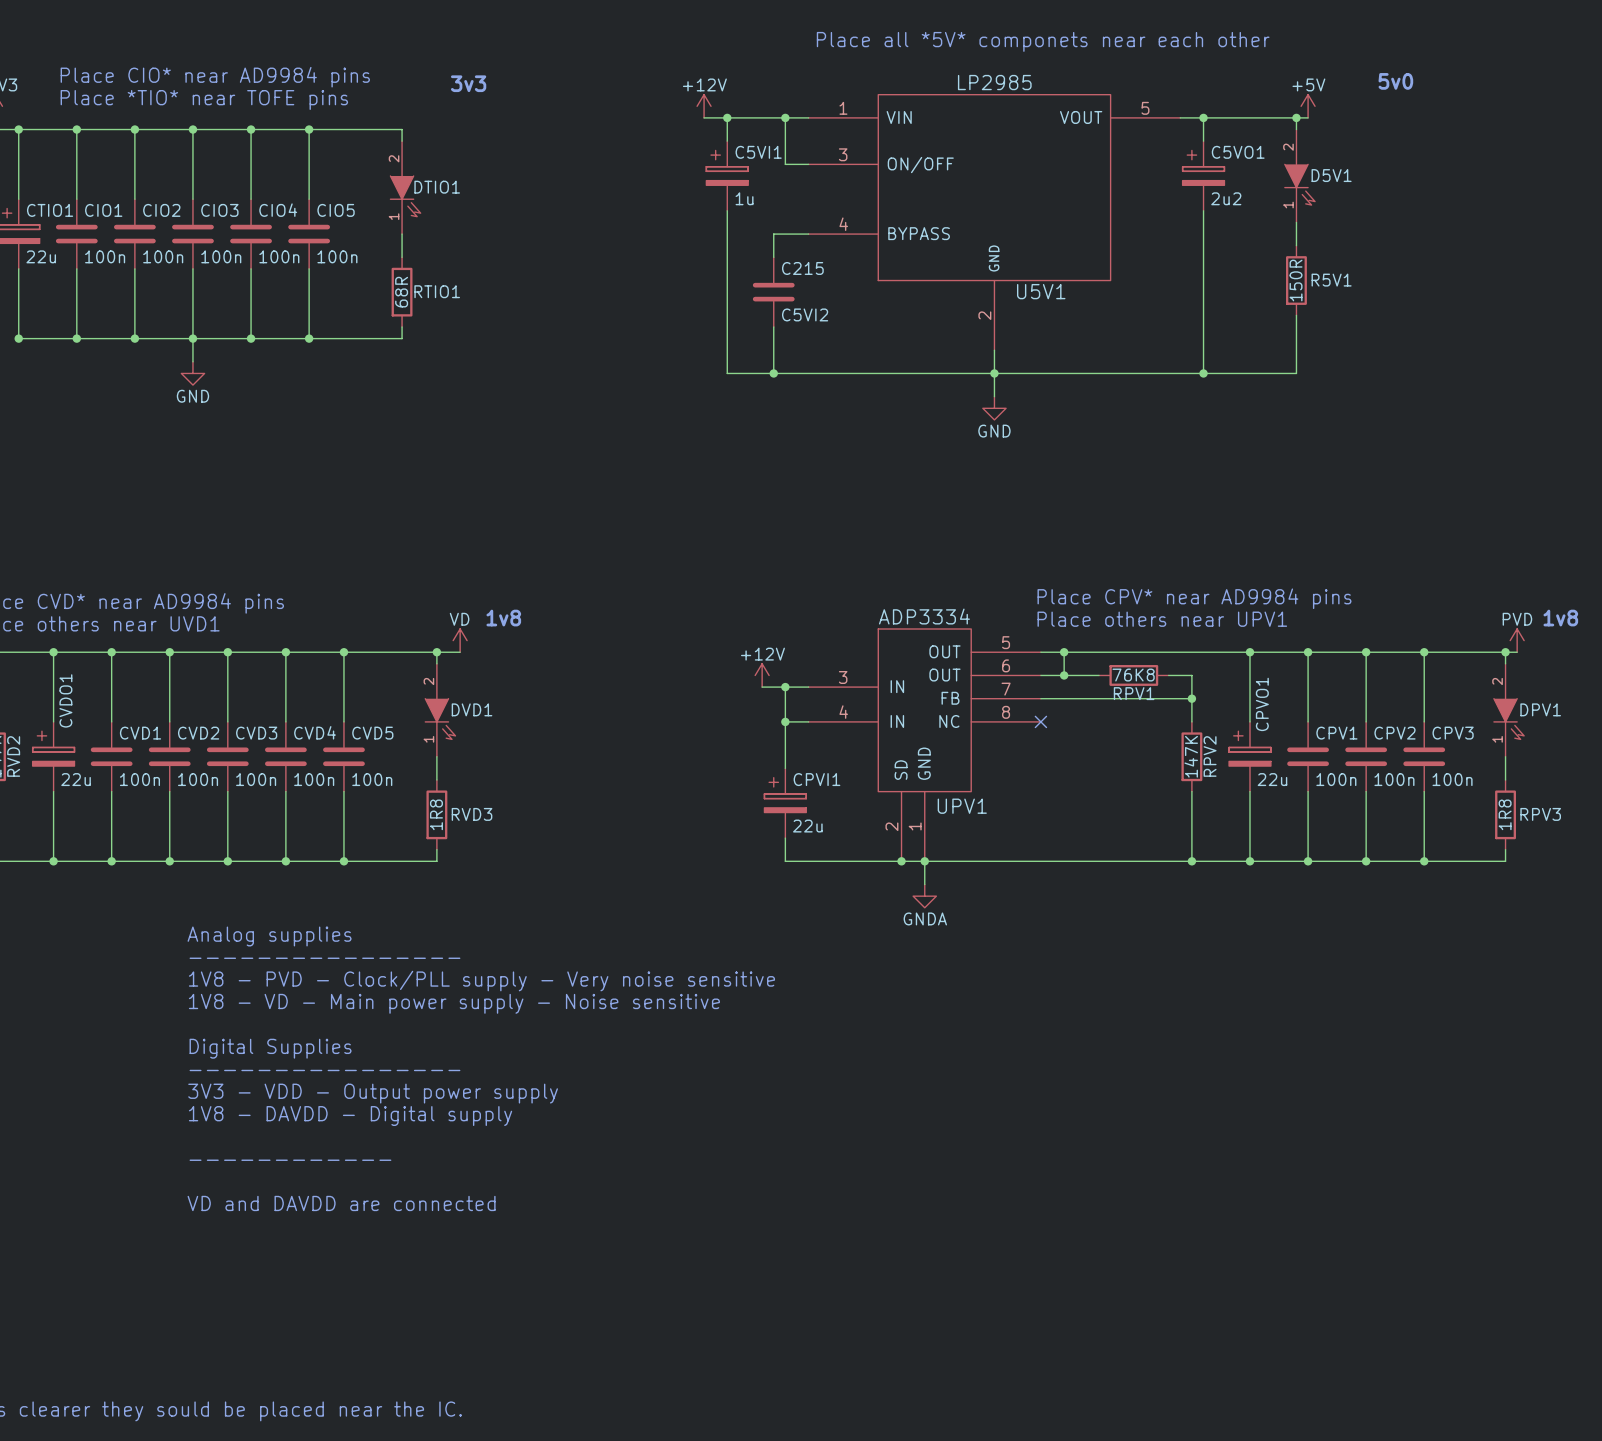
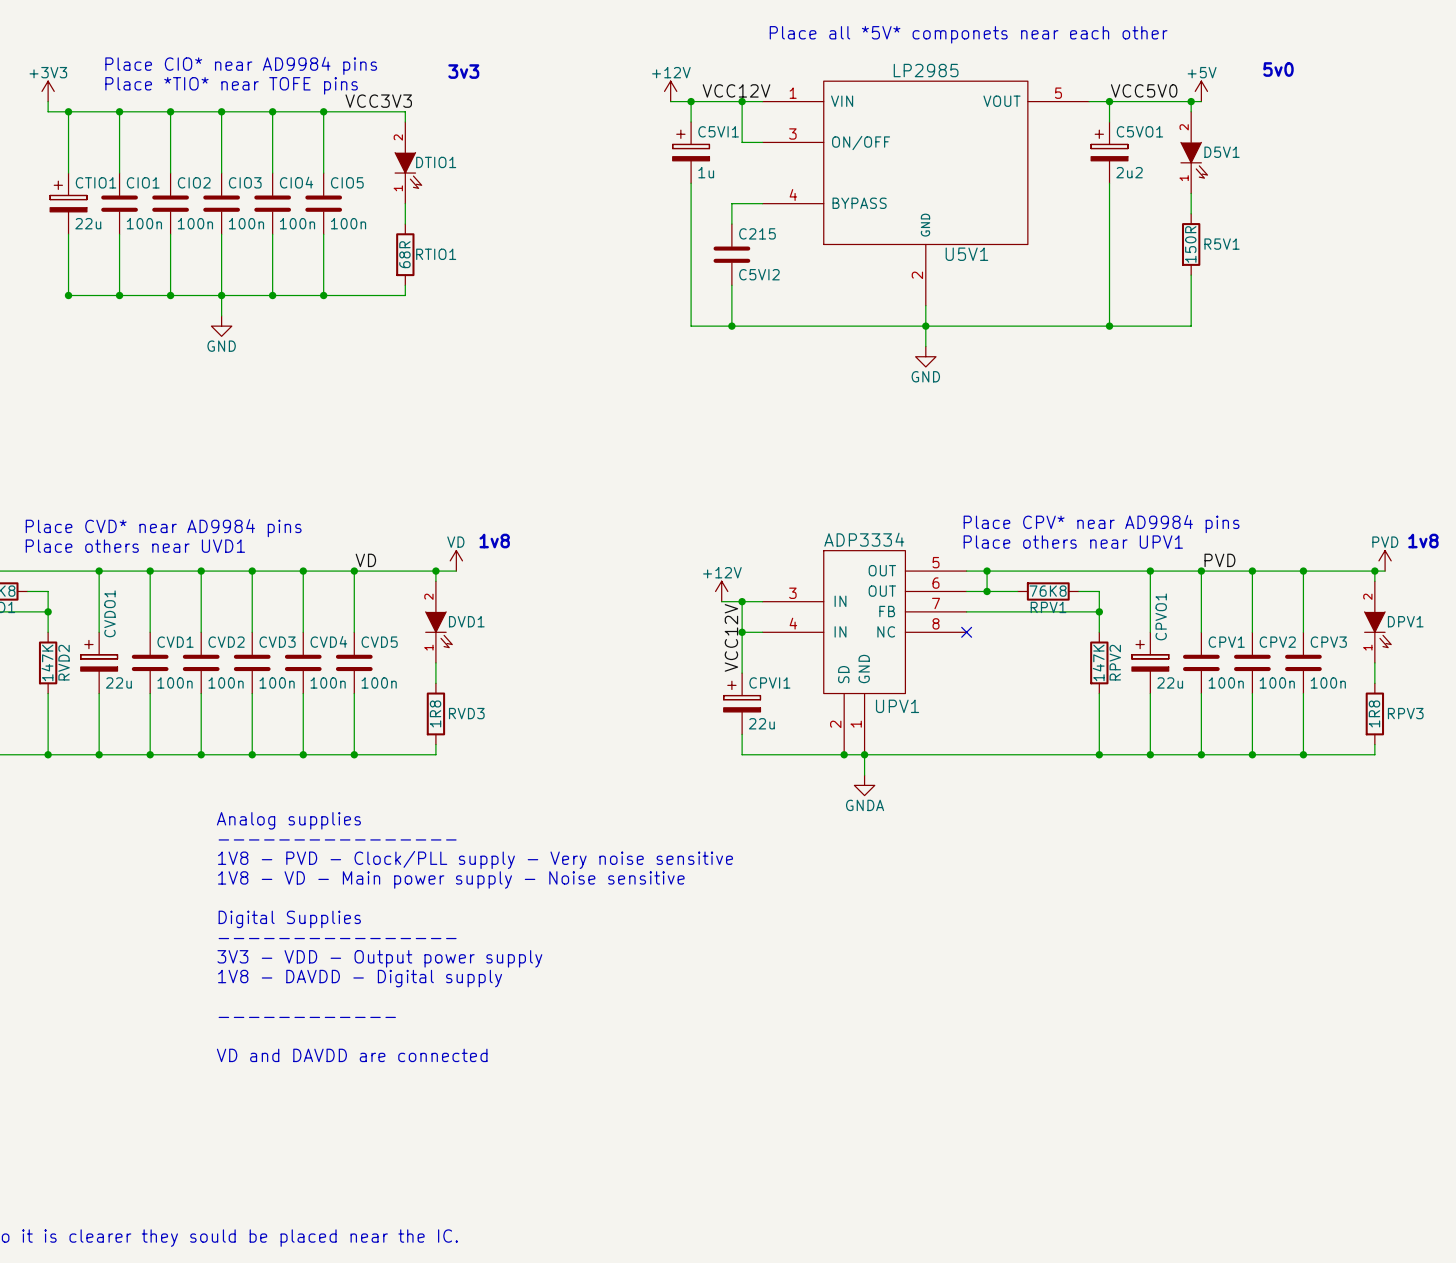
label: none -> VCC12V (736, 90)
label: none -> VCC5V0 (1144, 90)
label: none -> VCC3V3 (378, 101)
label: none -> VD (365, 560)
label: none -> PVD (1219, 560)
label: none -> VCC12V (731, 637)

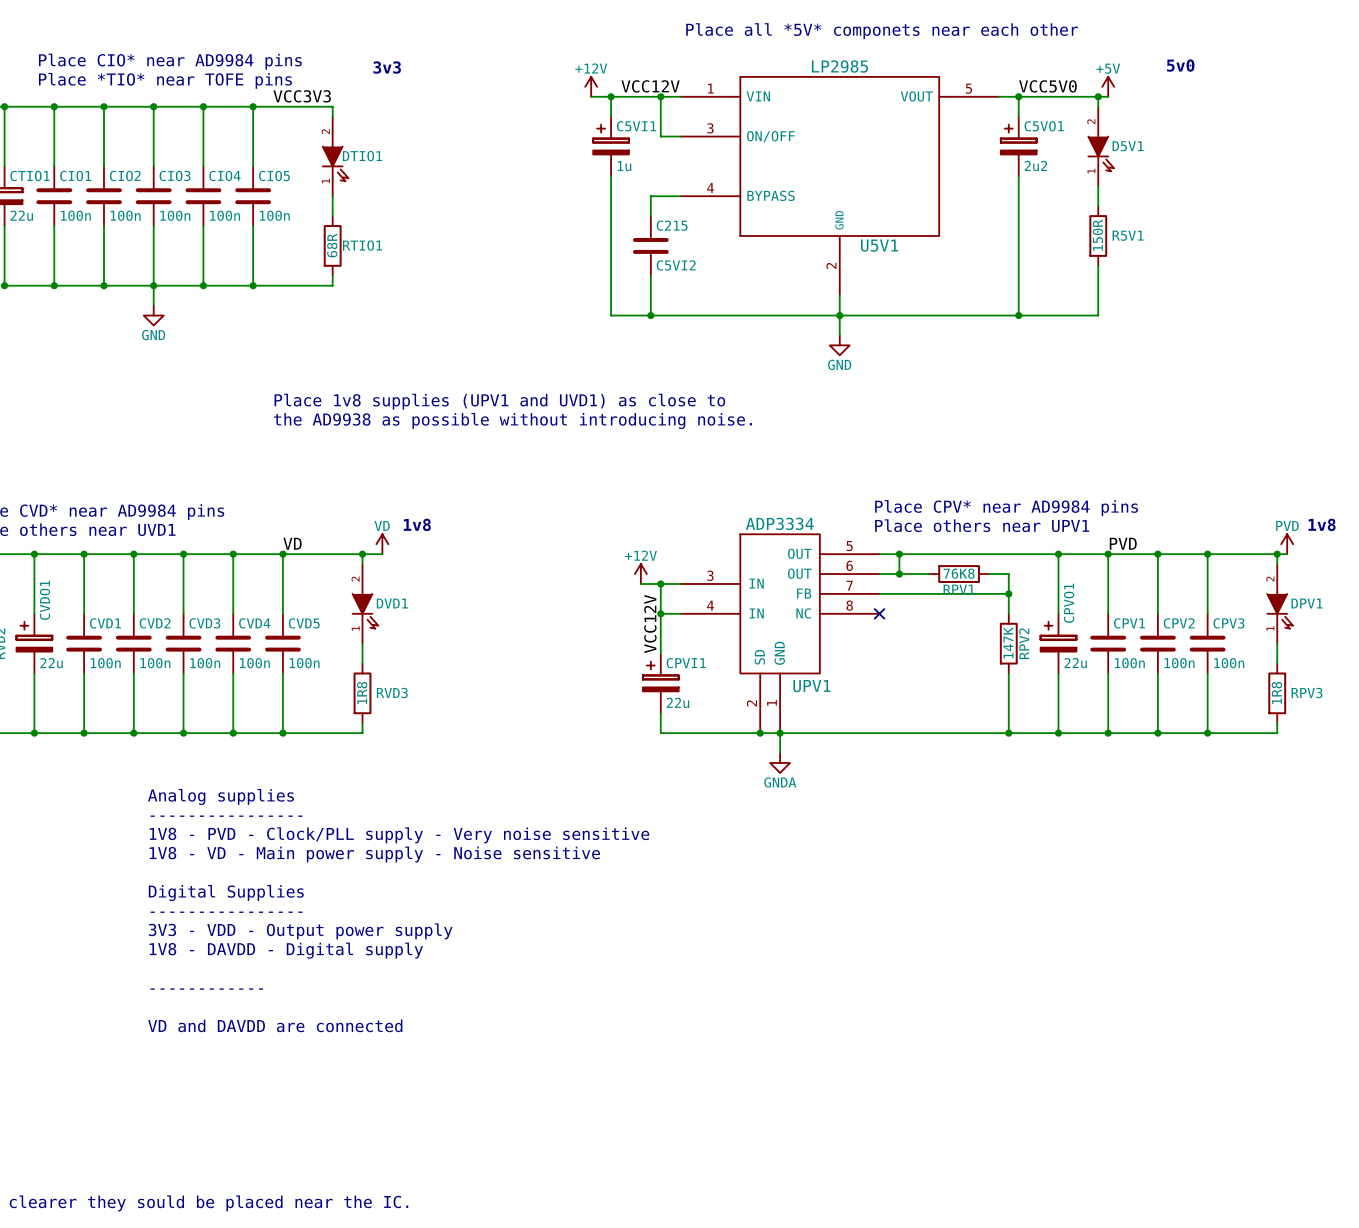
text: none -> Place 1v8 supplies (UPV1 and UVD1) as close to (499, 401)
text: none -> the AD9938 as possible without introducing noise. (512, 420)

